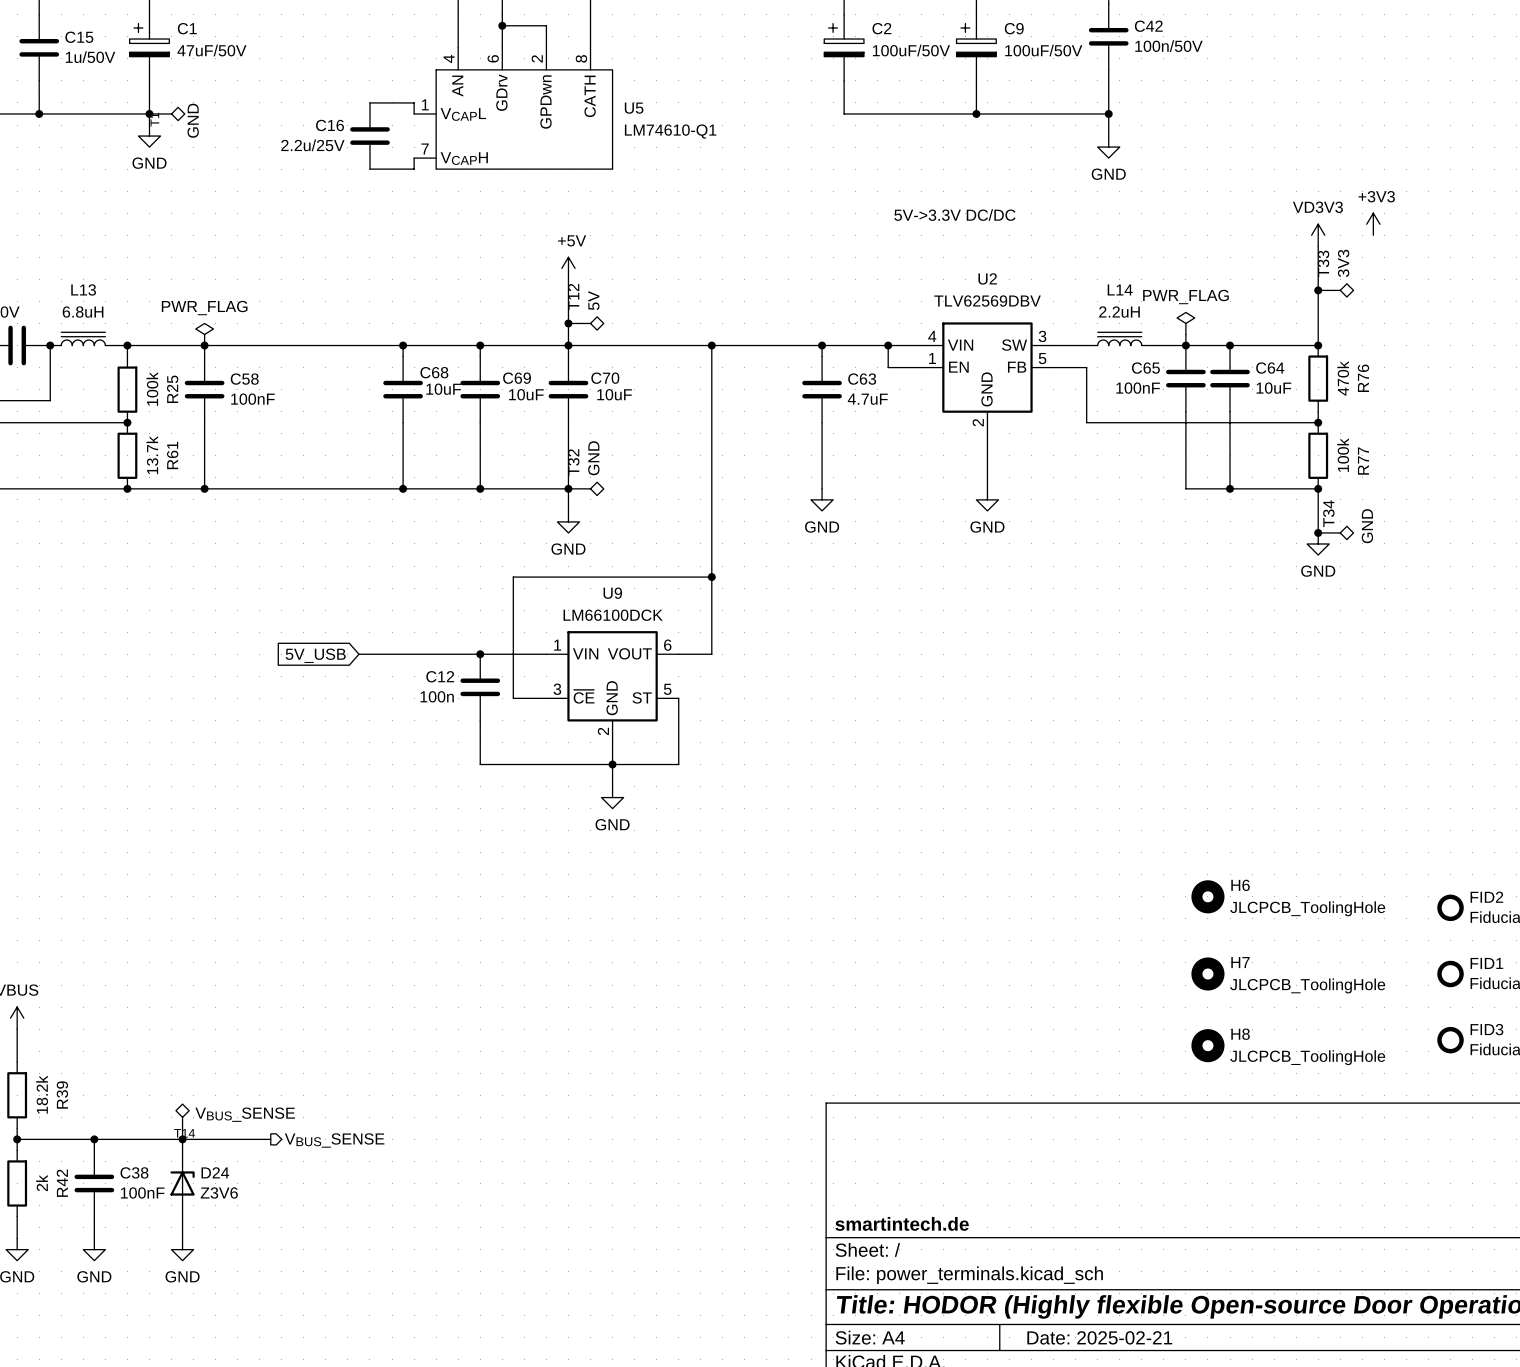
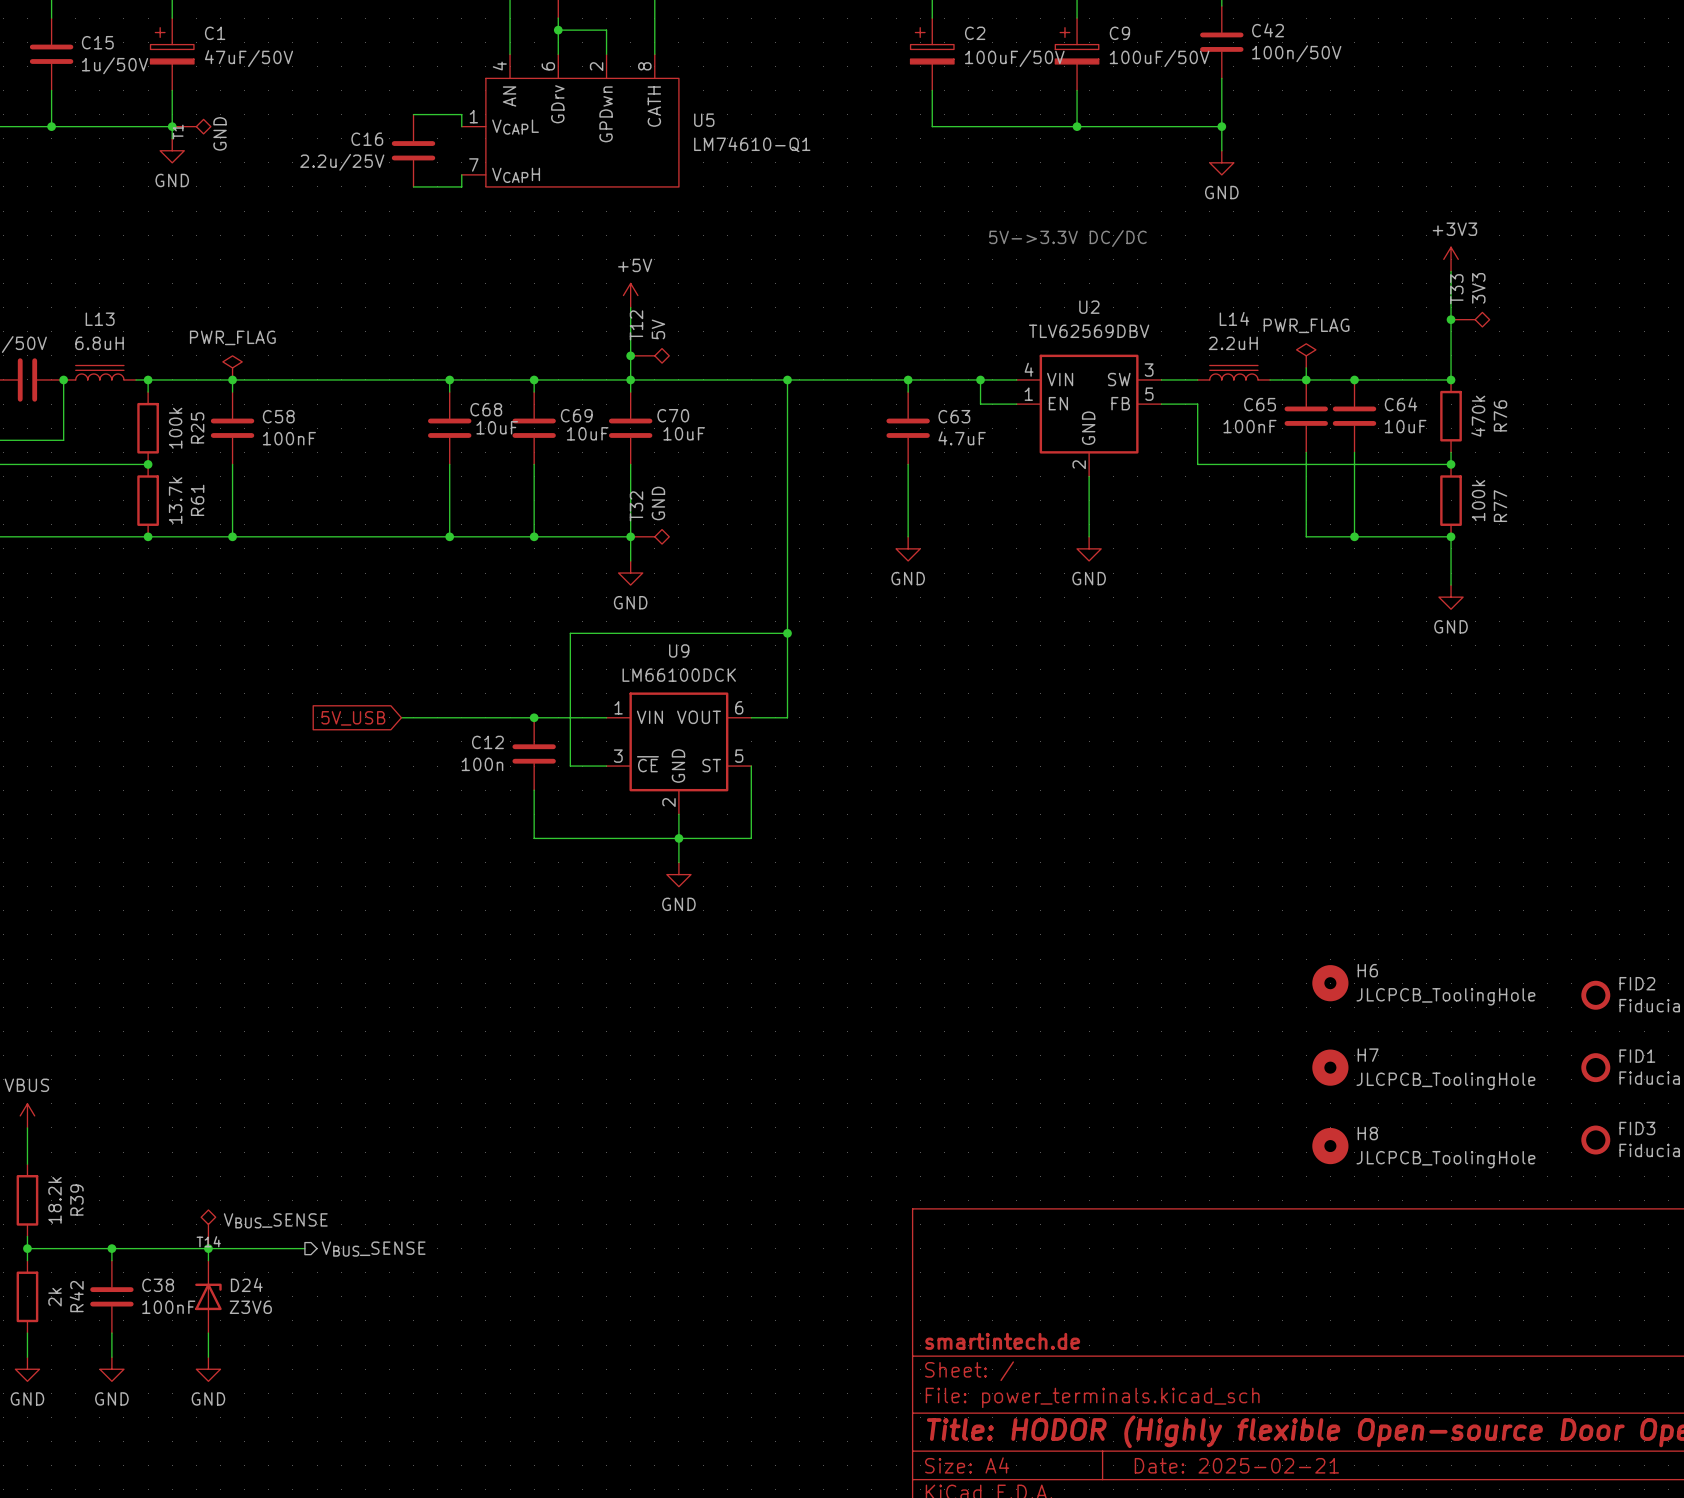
power symbol: +3V3 (1373, 224) -> none
power symbol: VD3V3 (1318, 235) -> +3V3 (1451, 259)
junction: (1318, 532) -> none
T34: GND (1335, 532) -> none

